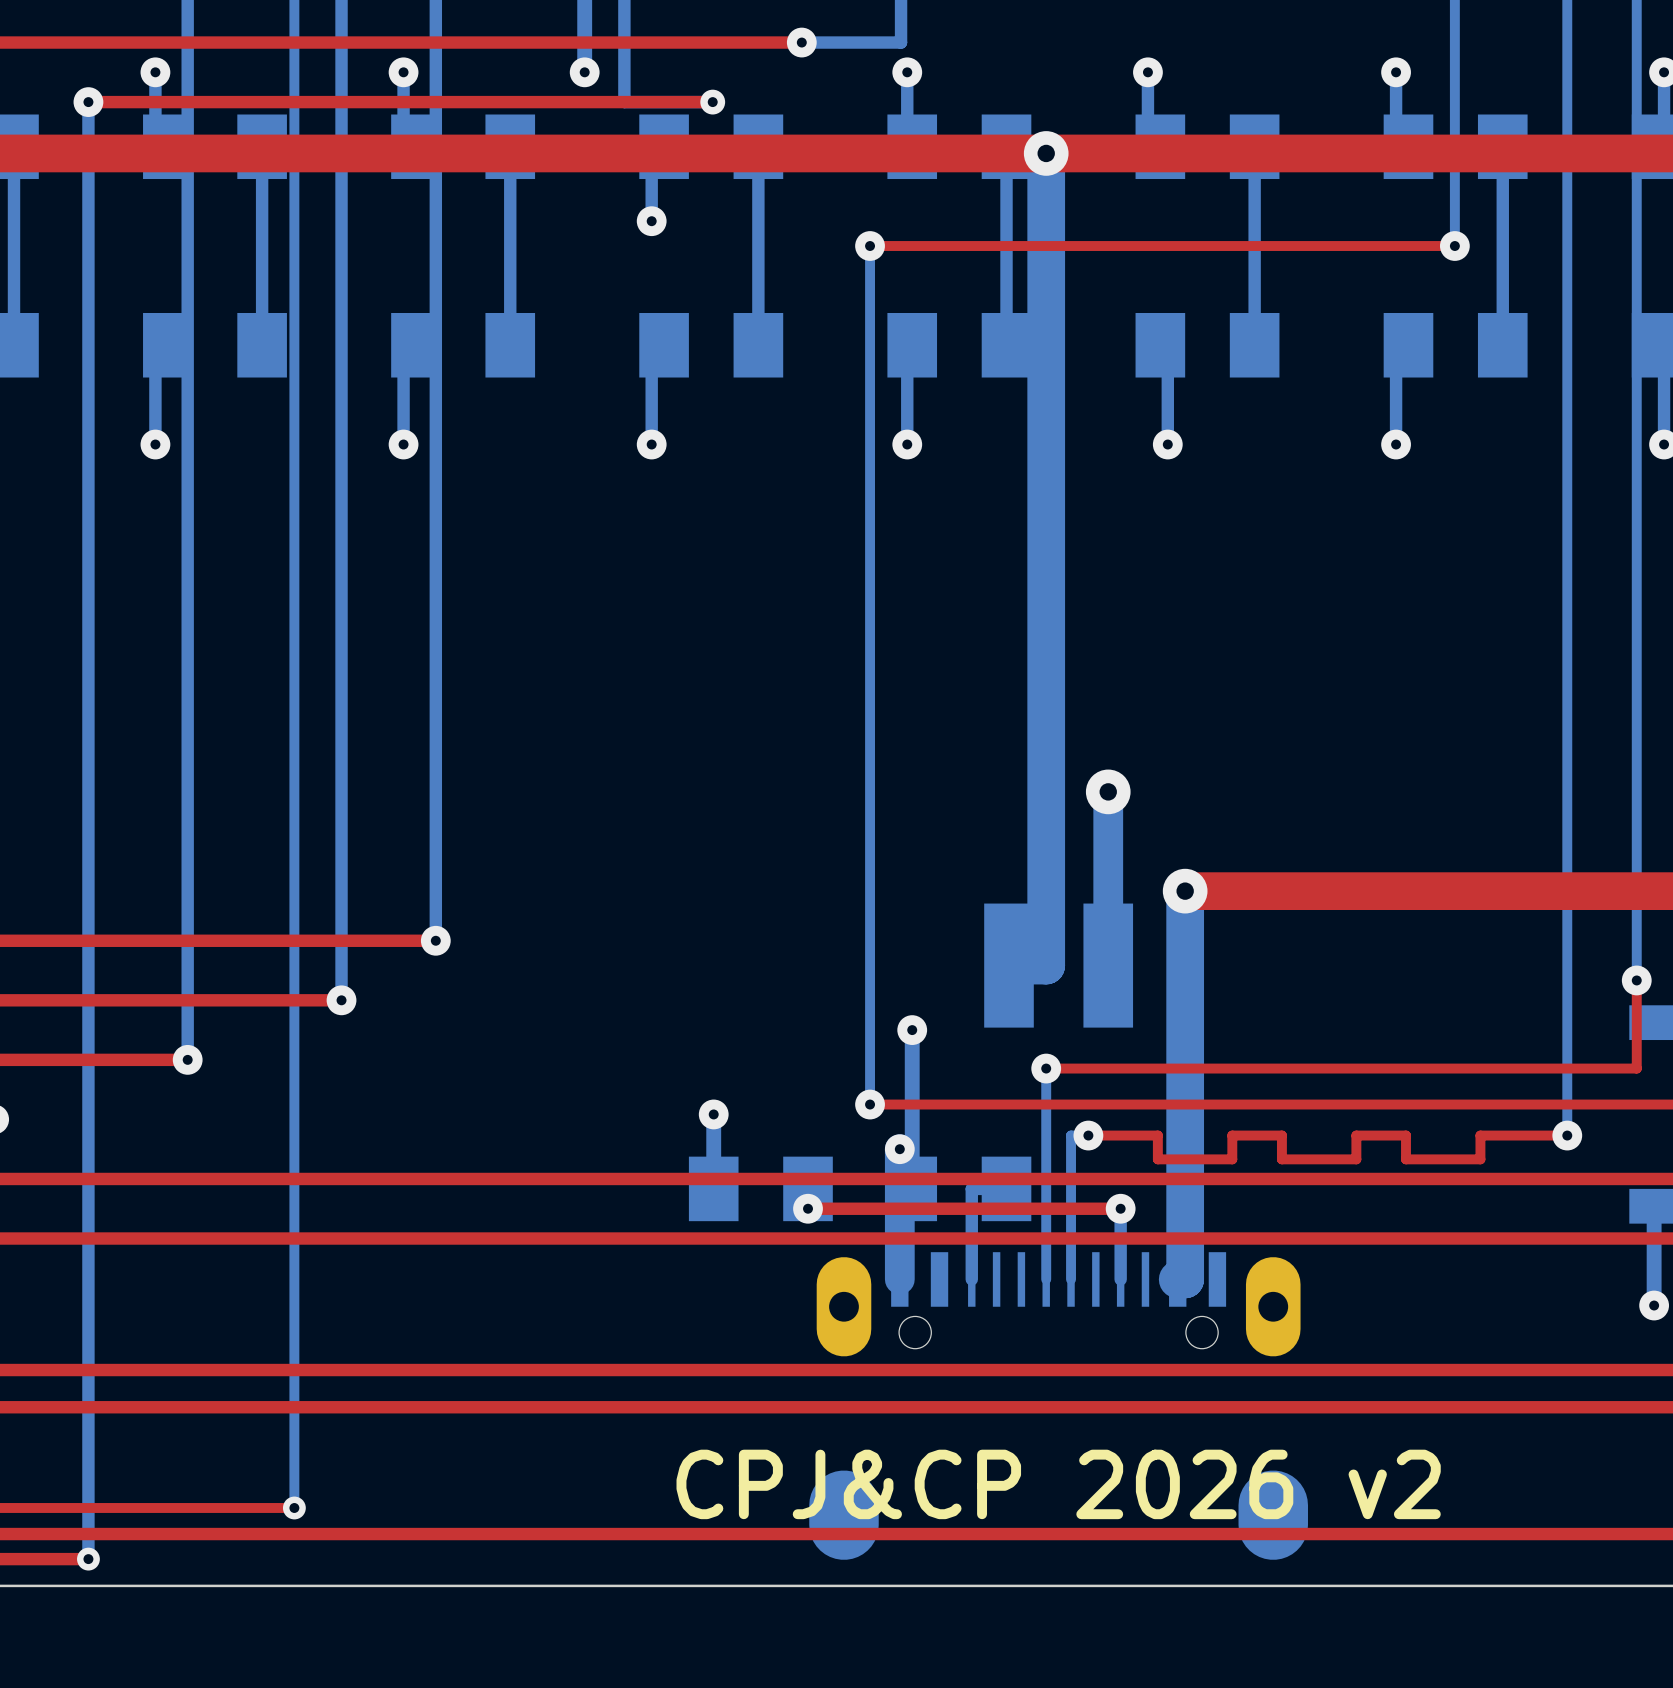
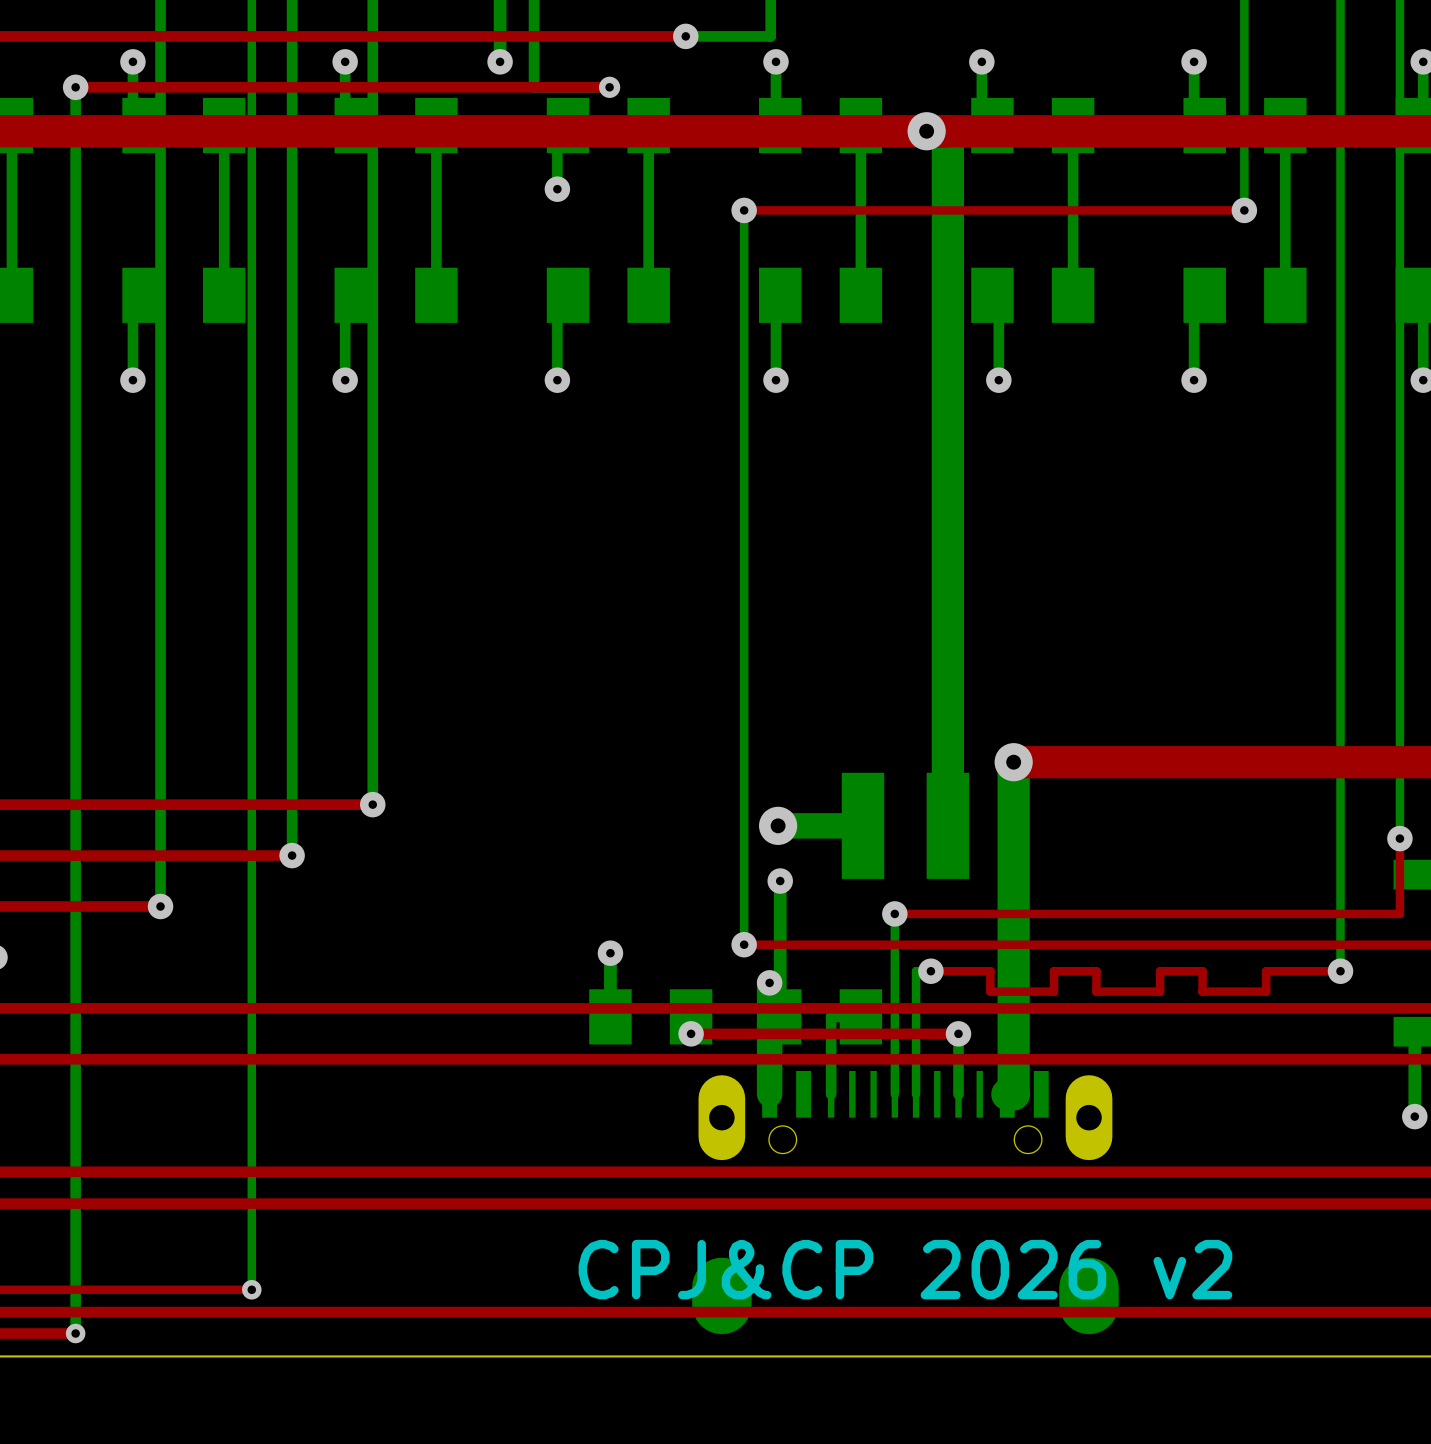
bottom track: (1046, 153) (1046, 965) (1008, 965) -> (778, 825) (862, 825)
via position: (1046, 153) -> (926, 131)
bottom track: none -> (926, 131) (947, 131) (947, 677)
bottom track width: thin (1108, 791) (1108, 965) -> thick (947, 677) (947, 825)
via position: (1108, 791) -> (778, 825)

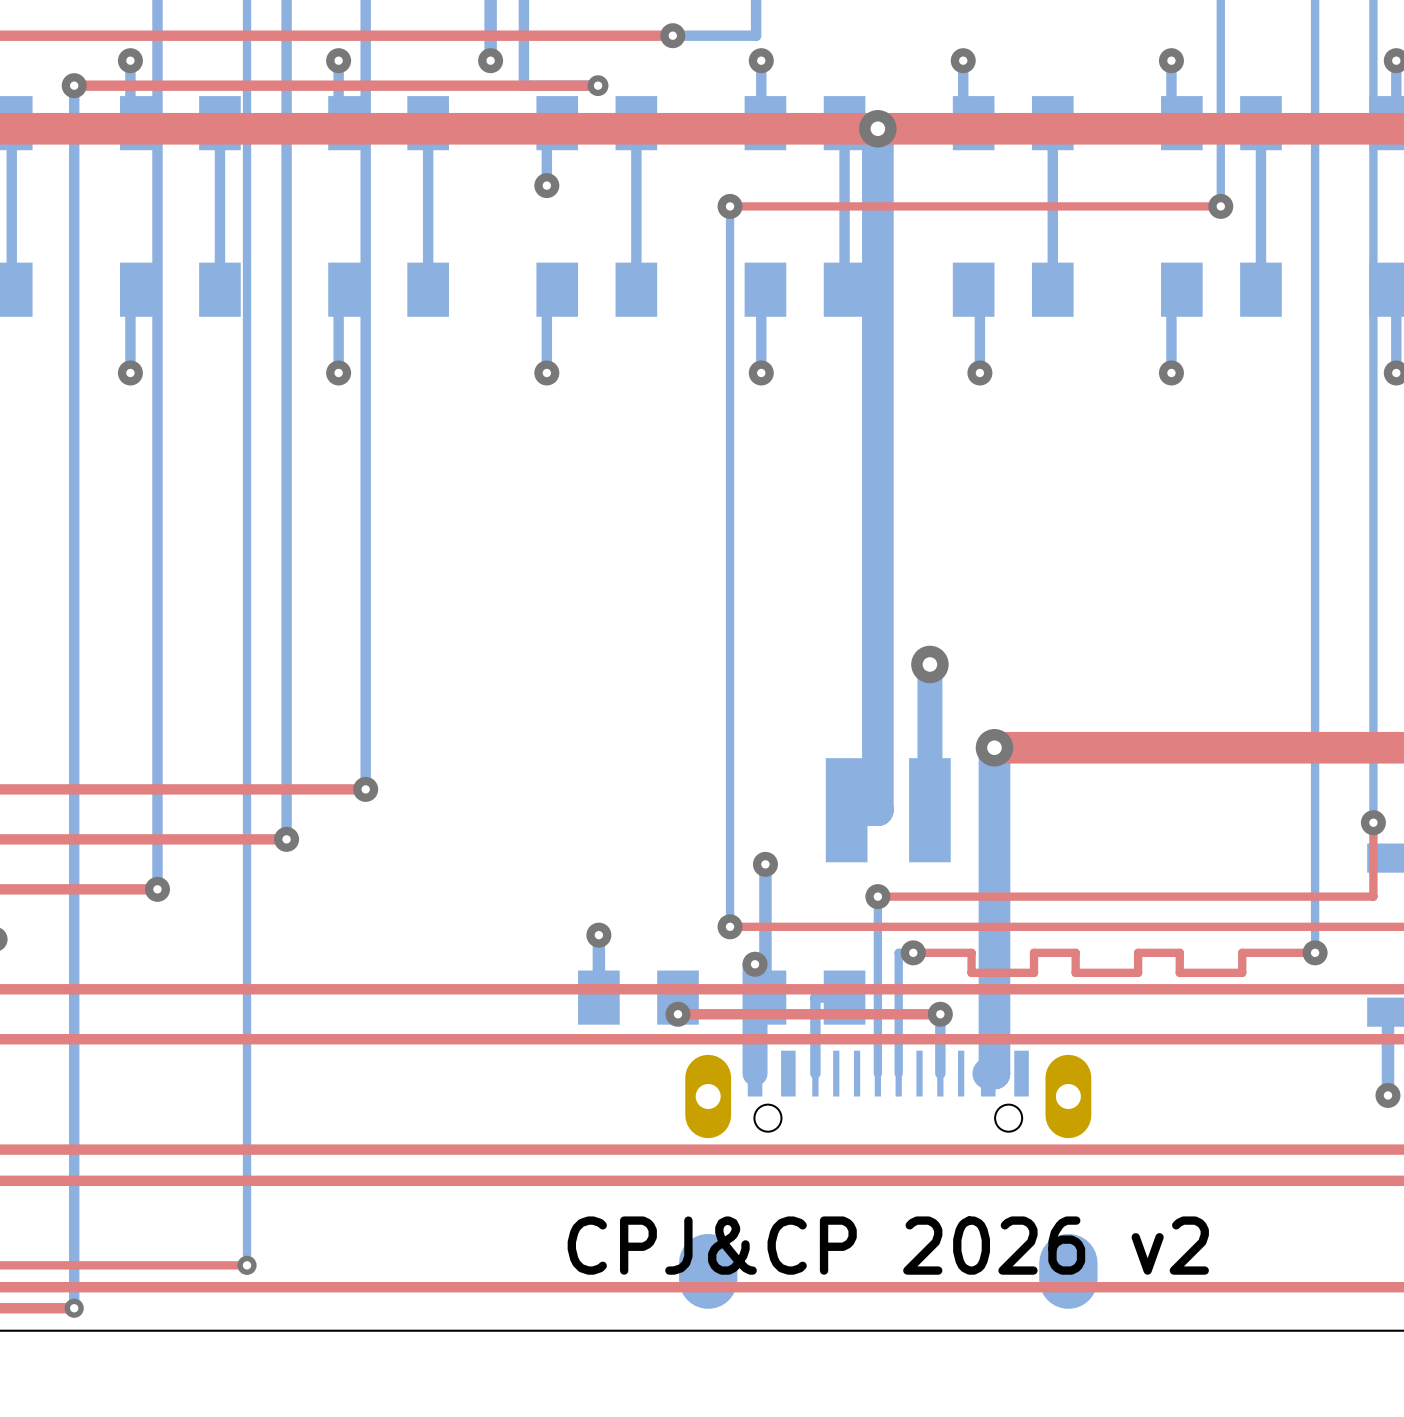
bottom track: (926, 131) (947, 131) (947, 677) -> none
via position: (926, 131) -> (877, 128)
bottom track width: thick (947, 677) (947, 825) -> thin (929, 664) (929, 810)
bottom track: (778, 825) (862, 825) -> (877, 128) (877, 810) (846, 810)
via position: (778, 825) -> (929, 664)

